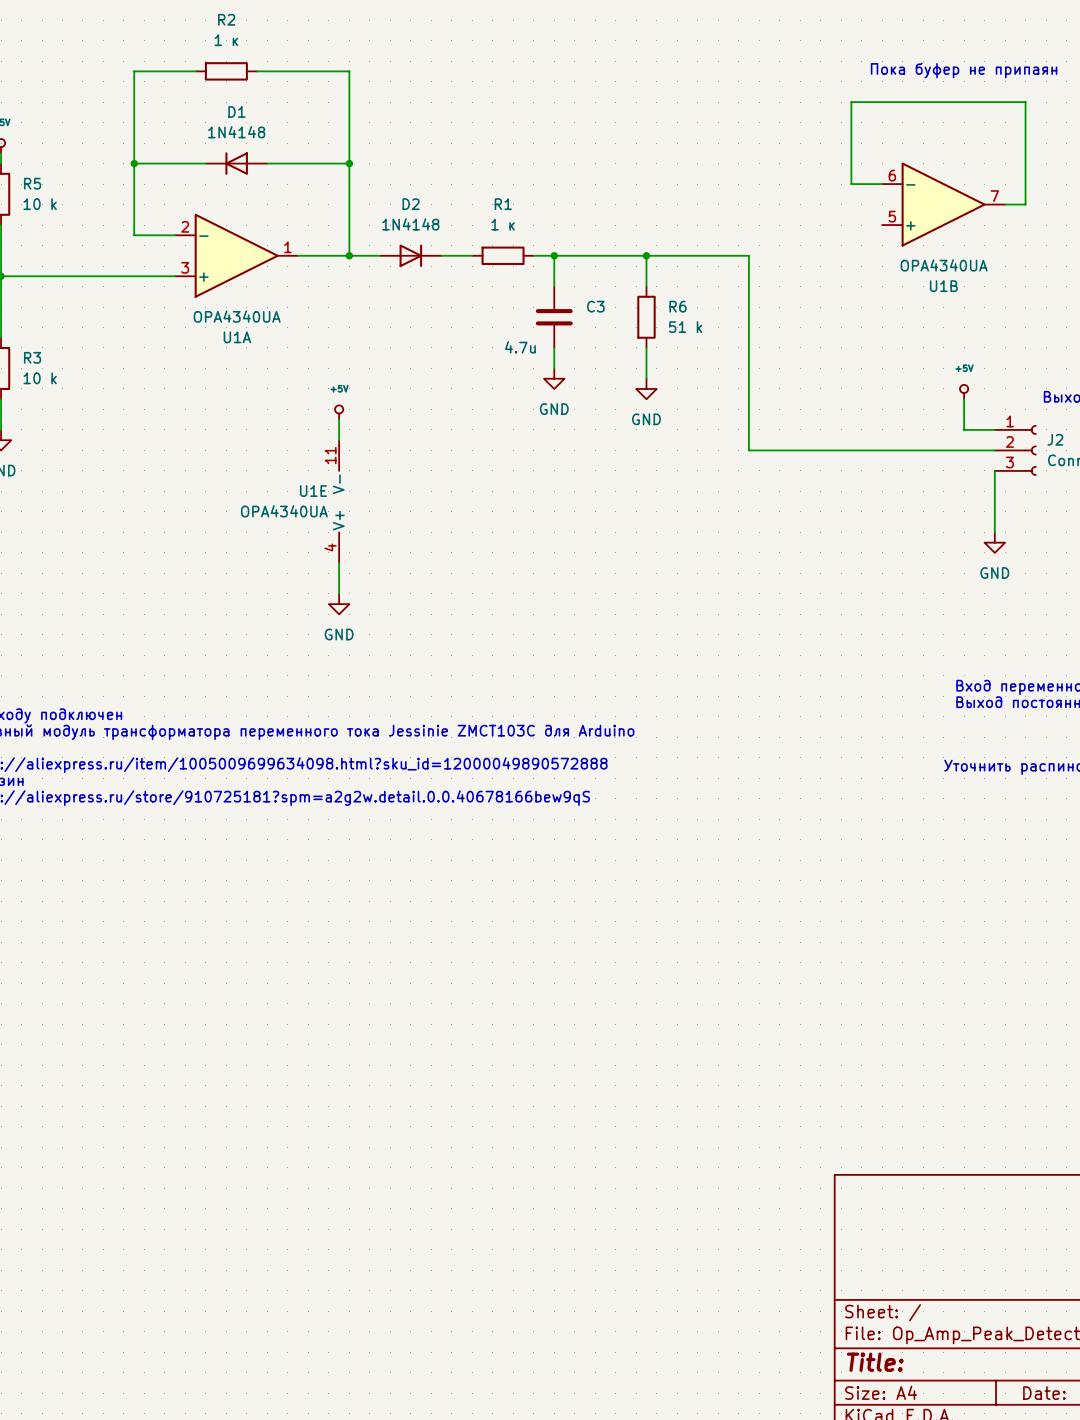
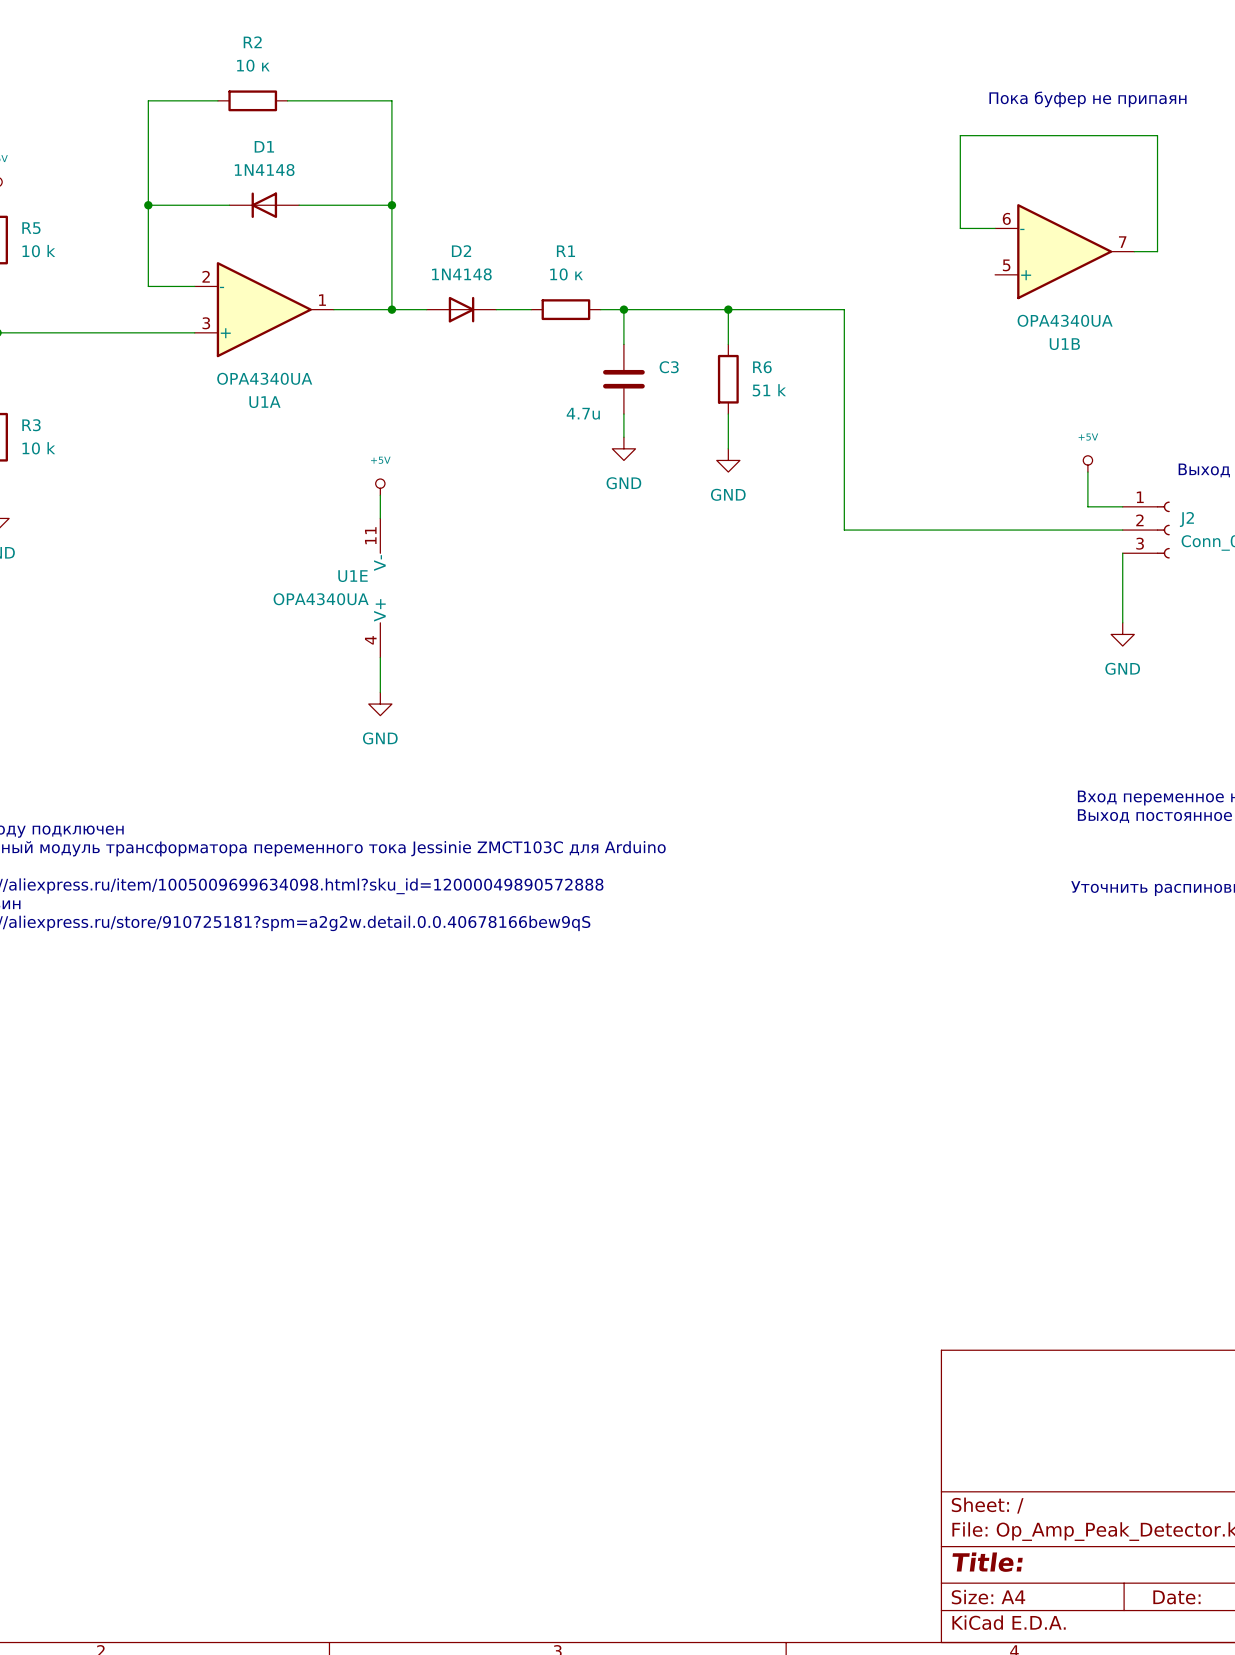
R2 value: 1 к (226, 40) -> 10 к (253, 65)
R1 value: 1 к (503, 224) -> 10 к (566, 274)

